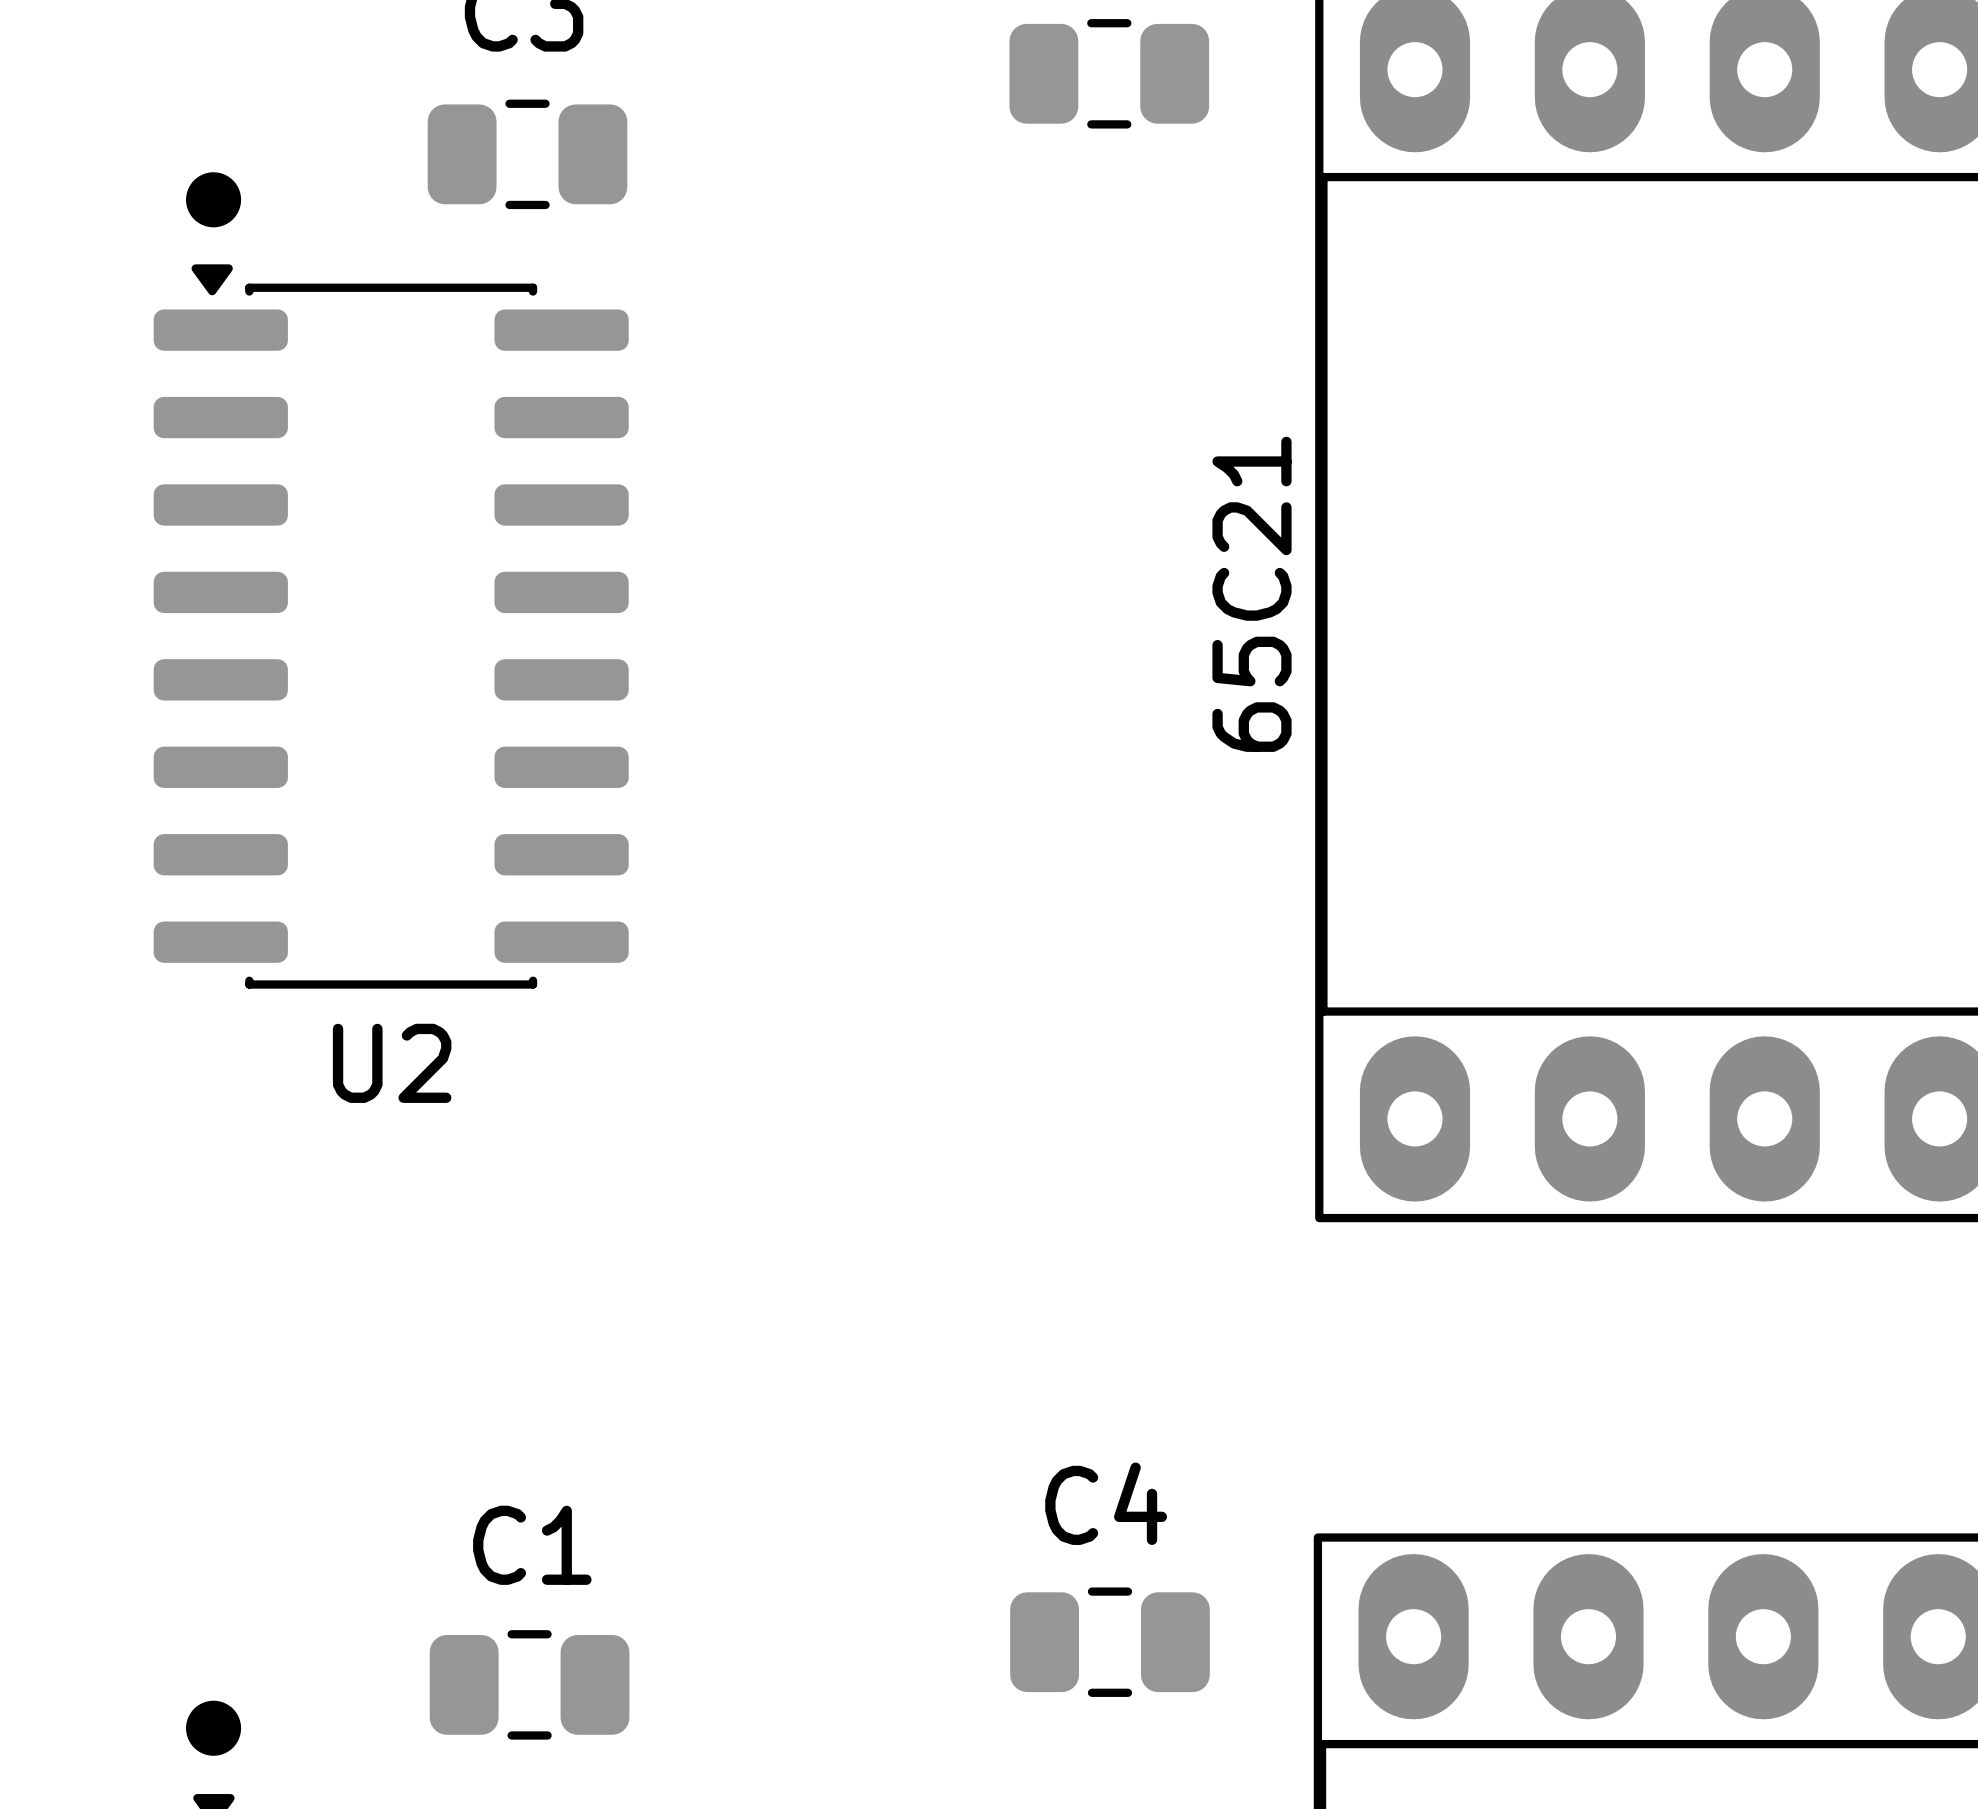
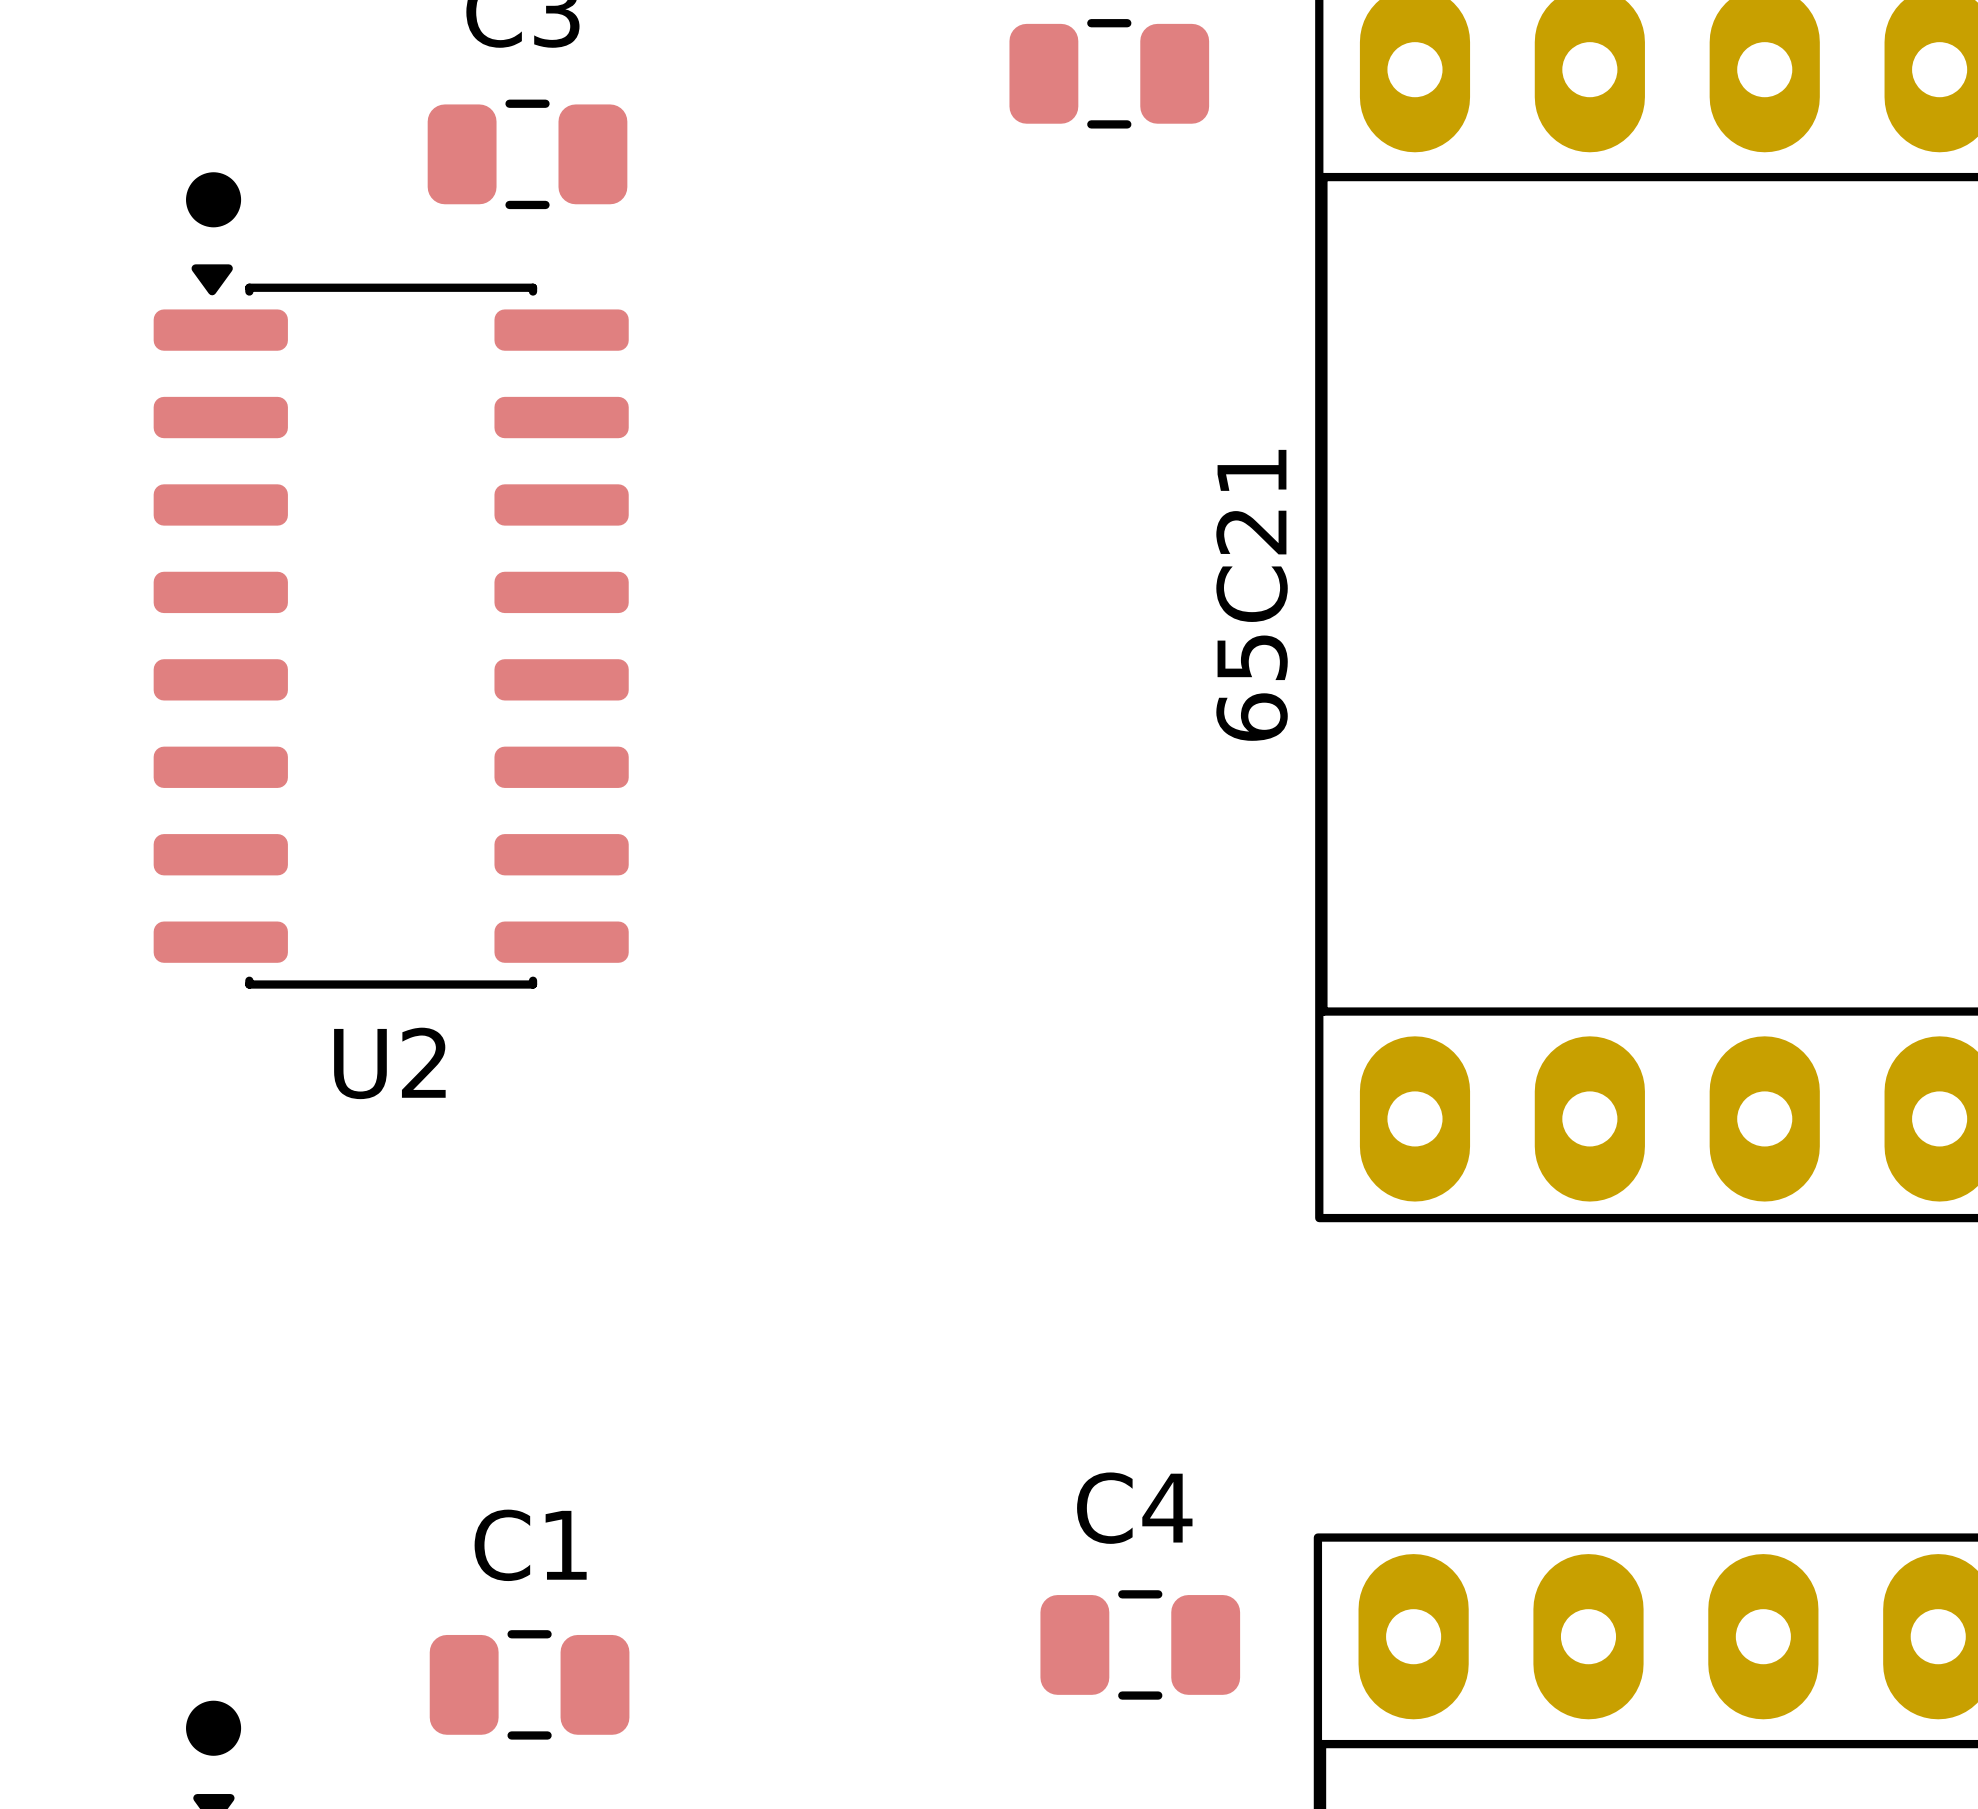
C4 position: (1109, 1642) -> (1140, 1644)

